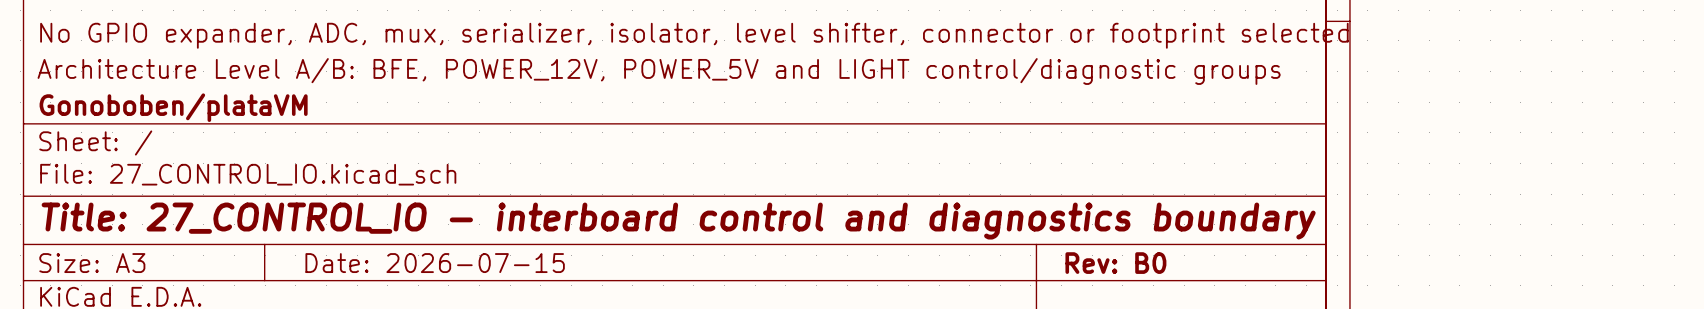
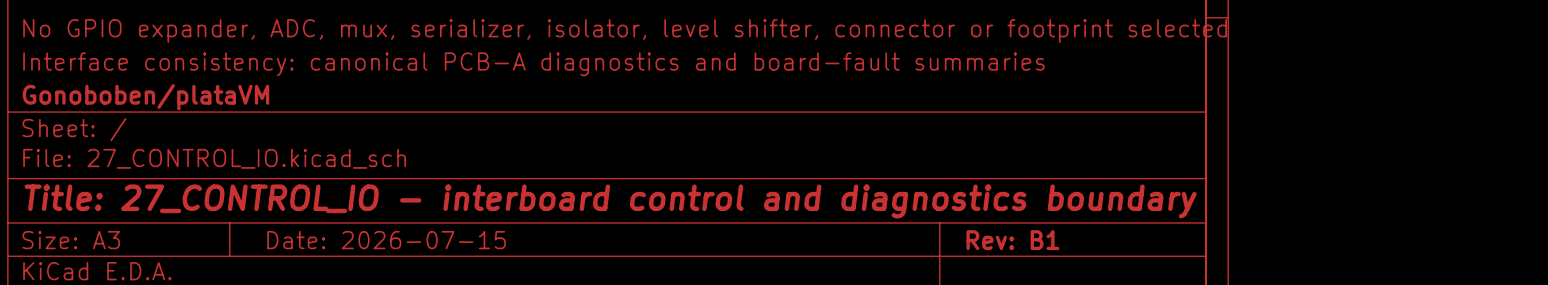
title block: Architecture Level A/B: BFE, POWER_12V, POWER_5V and LIGHT control/diagnostic groups (659, 71) -> Interface consistency: canonical PCB-A diagnostics and board-fault summaries (533, 64)
title block: Rev: B0 (1115, 263) -> Rev: B1 (1012, 240)

